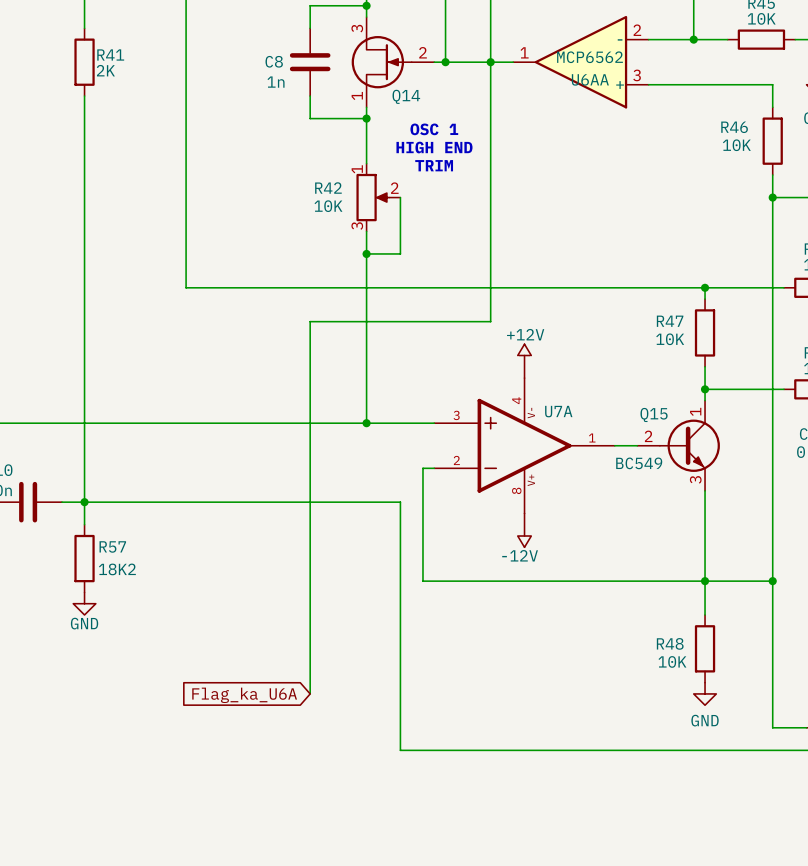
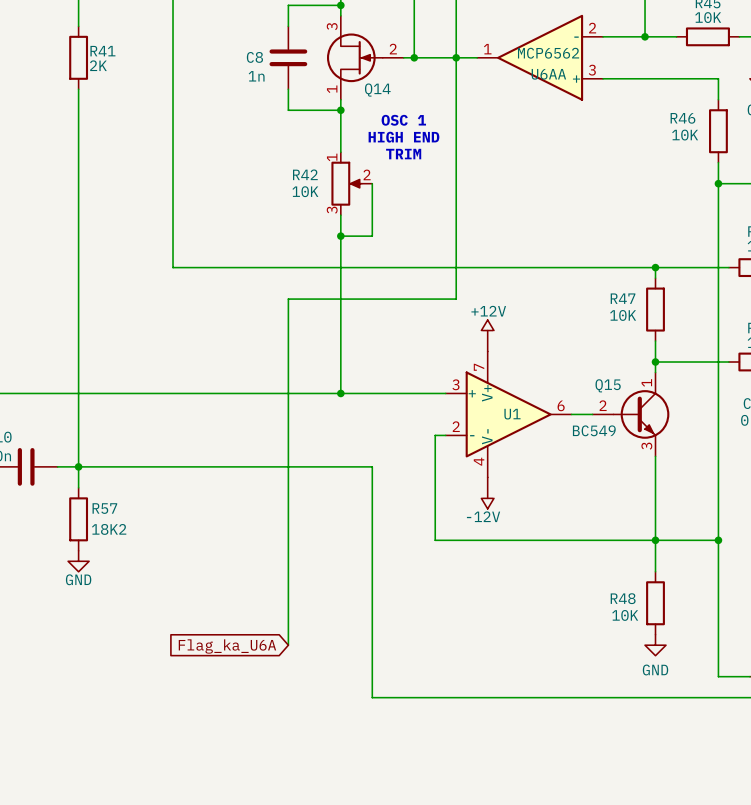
U7A: (524, 445) -> none
U1: none -> (508, 414)
wire: (434, 468) (422, 468) (422, 581) (468, 581) -> (445, 435) (435, 435) (435, 540)

